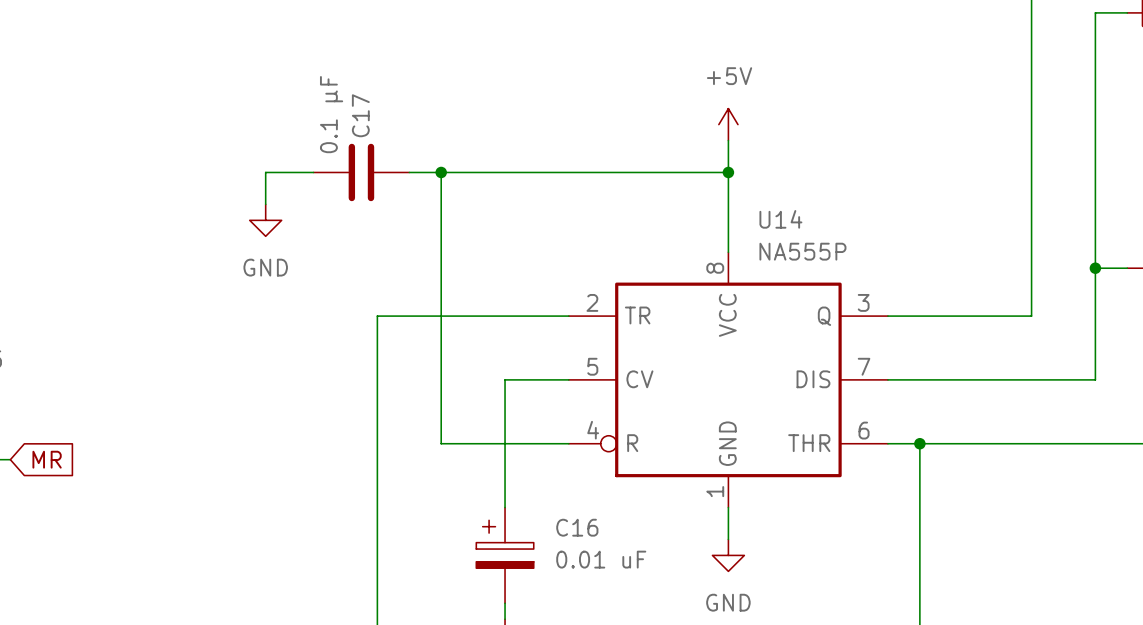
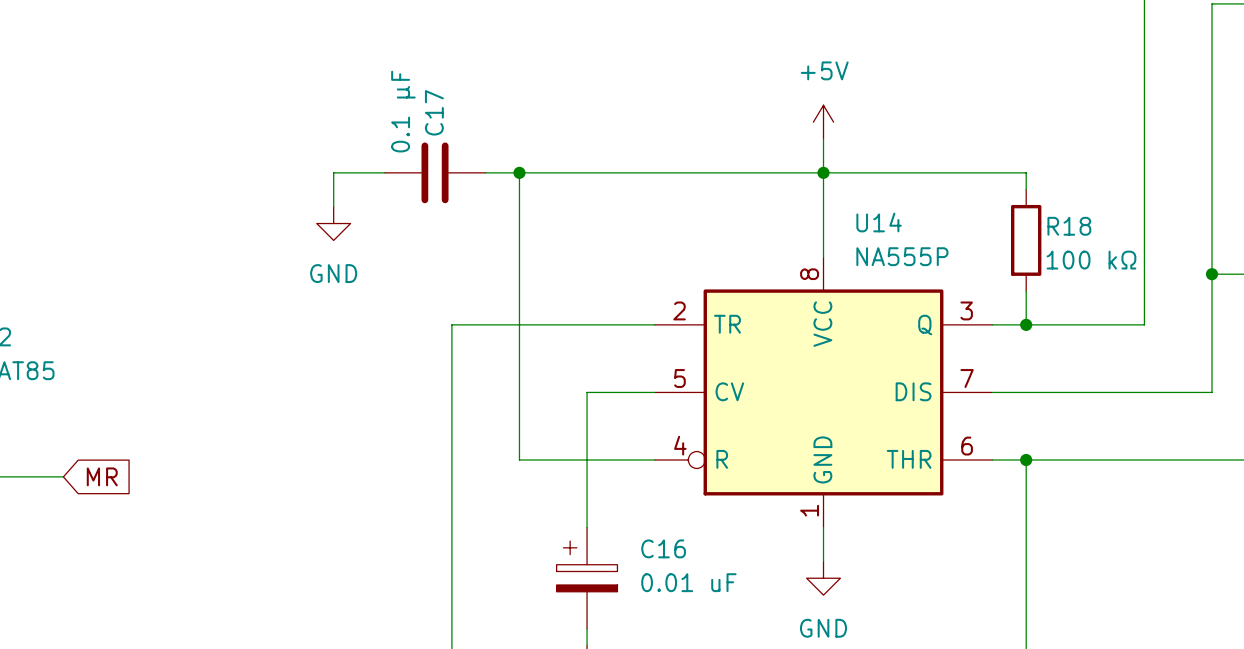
wire: none -> (823, 172) (1026, 172) (1026, 189)
R18: none -> 100 kΩ (1026, 240)
wire: none -> (1026, 291) (1026, 324)
junction: none -> (1026, 324)

